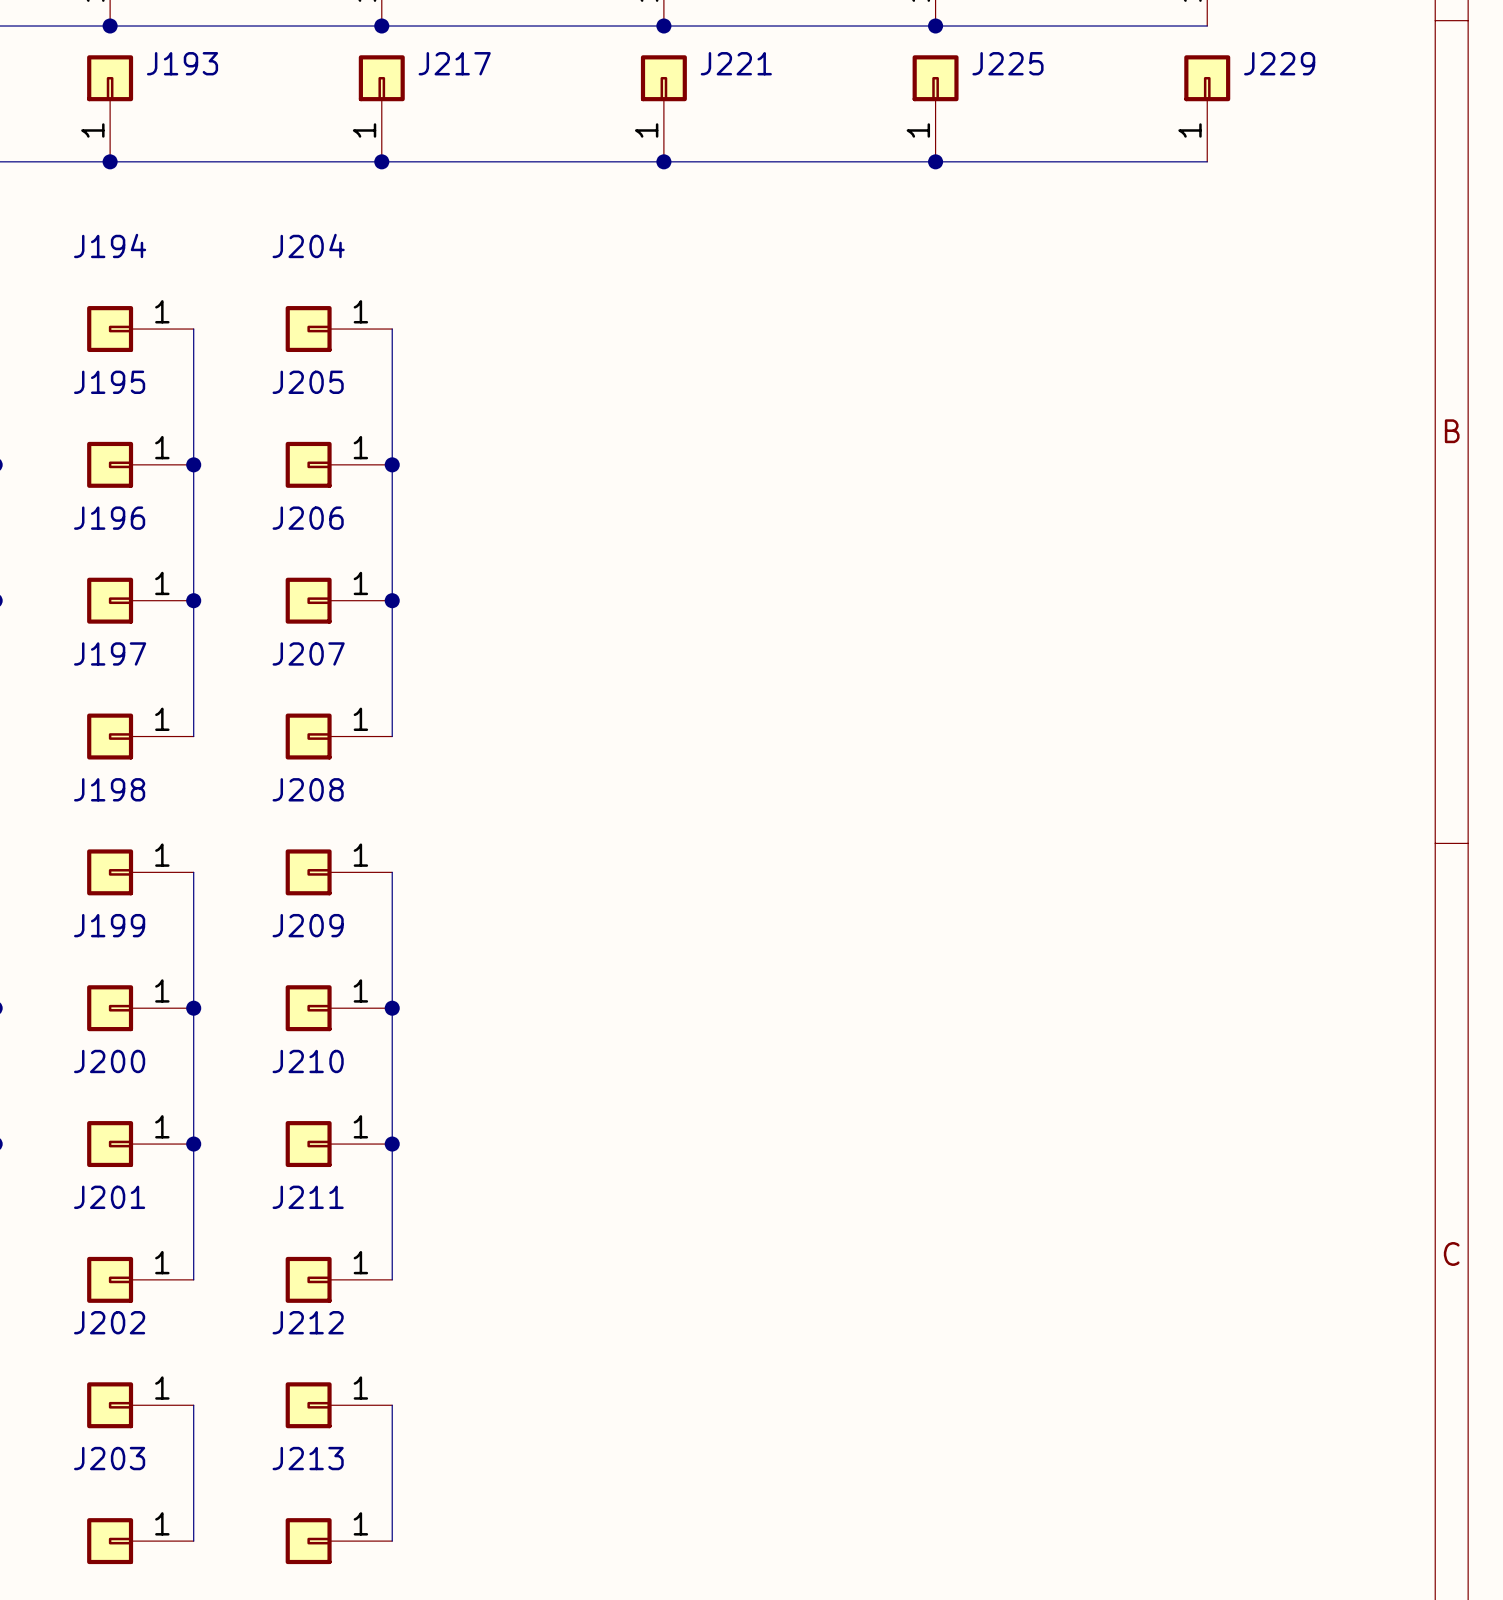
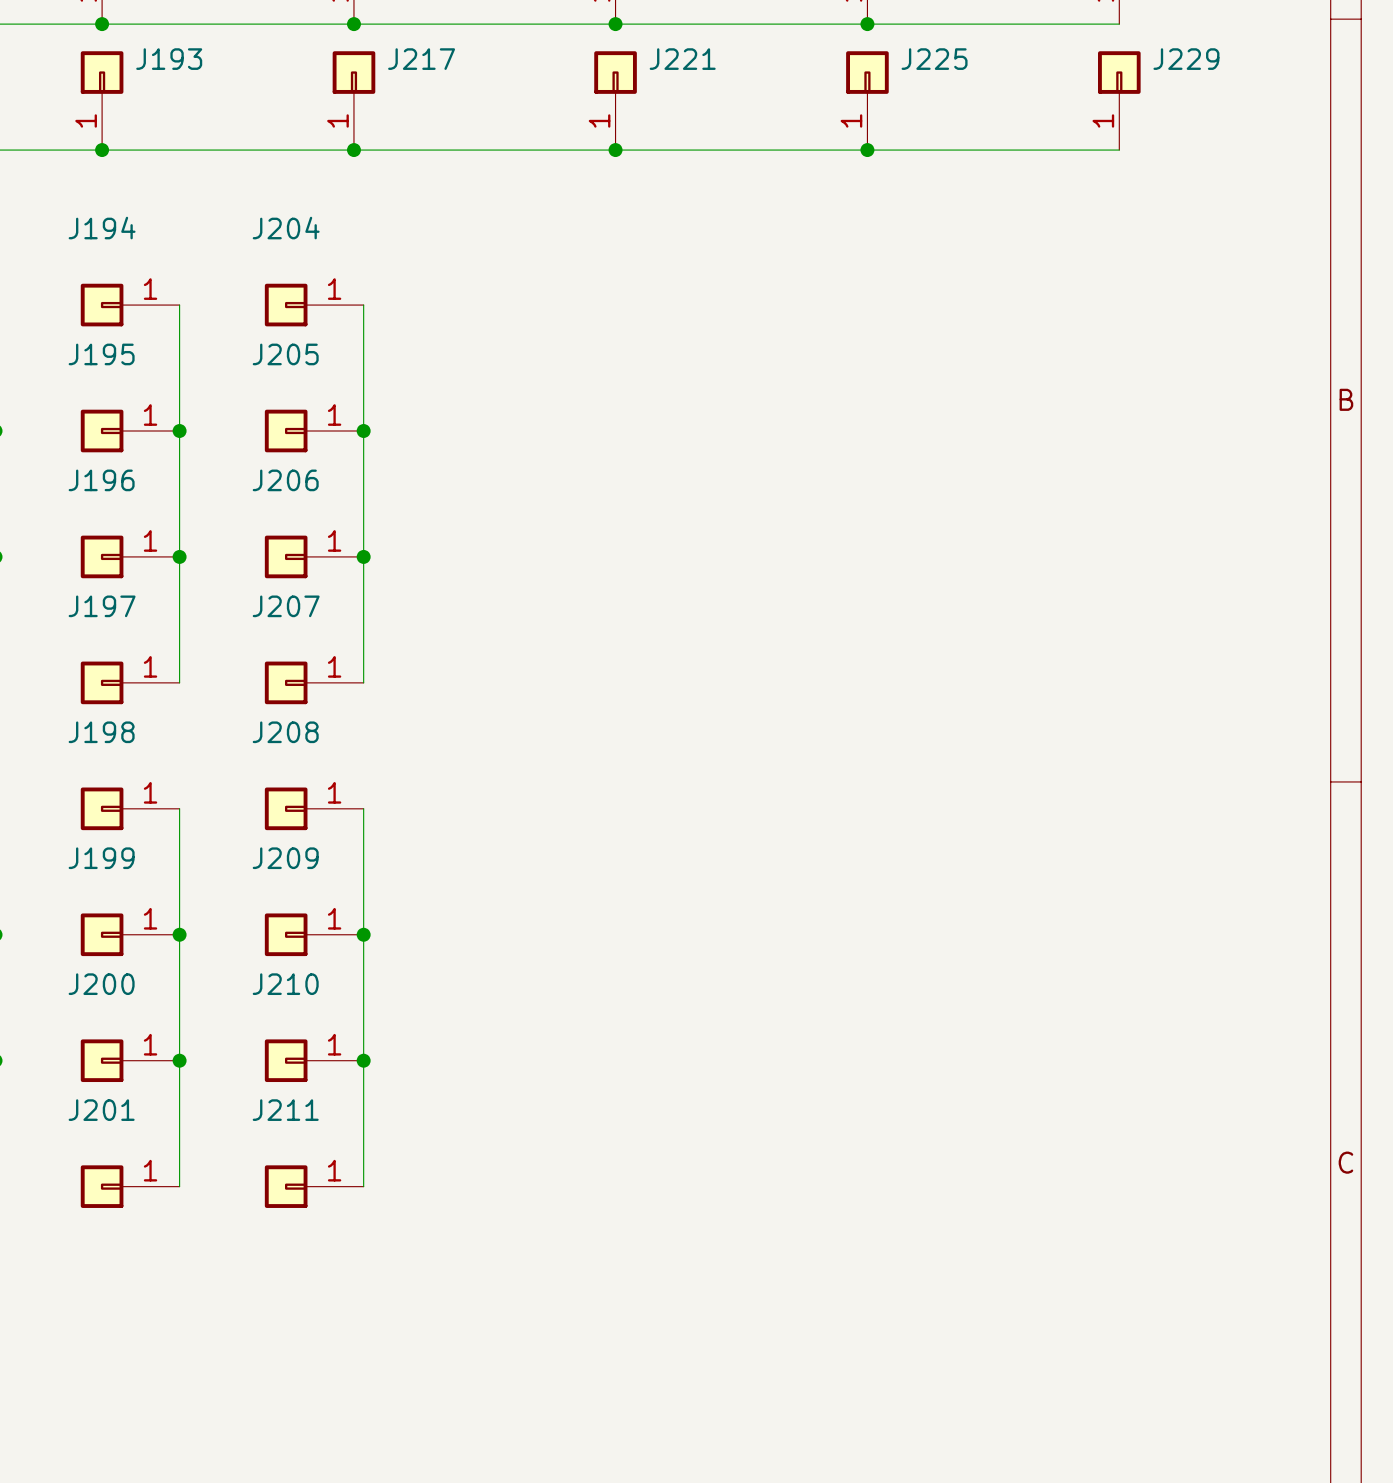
J202: (140, 1405) -> none
wire: (193, 1405) (193, 1541) -> none
J212: (338, 1405) -> none
wire: (392, 1405) (392, 1541) -> none
J203: (140, 1541) -> none
J213: (338, 1541) -> none

